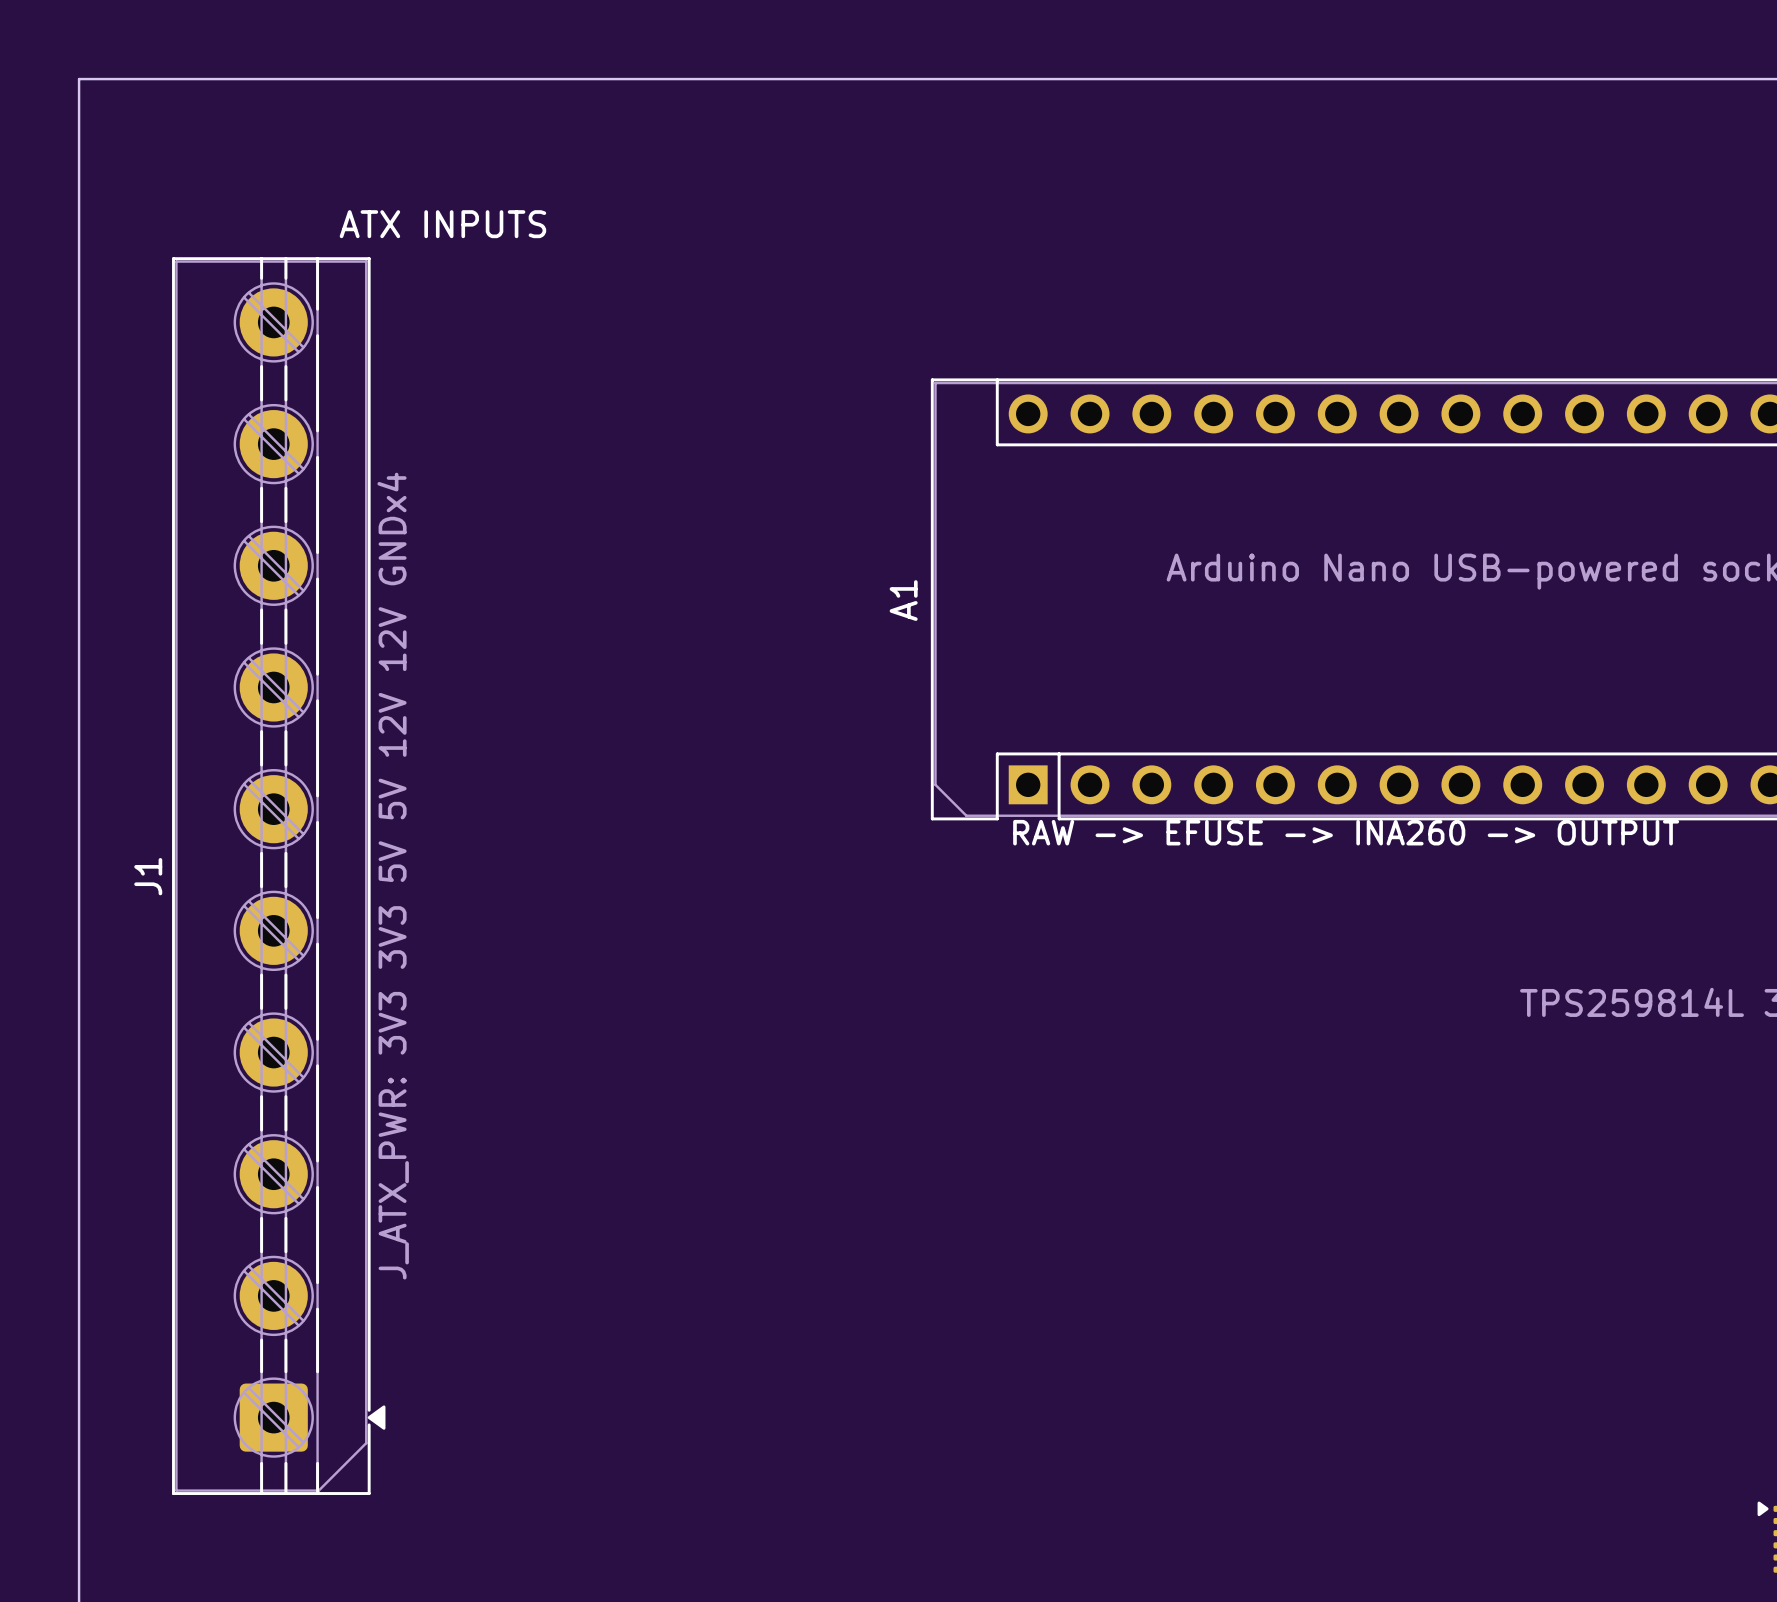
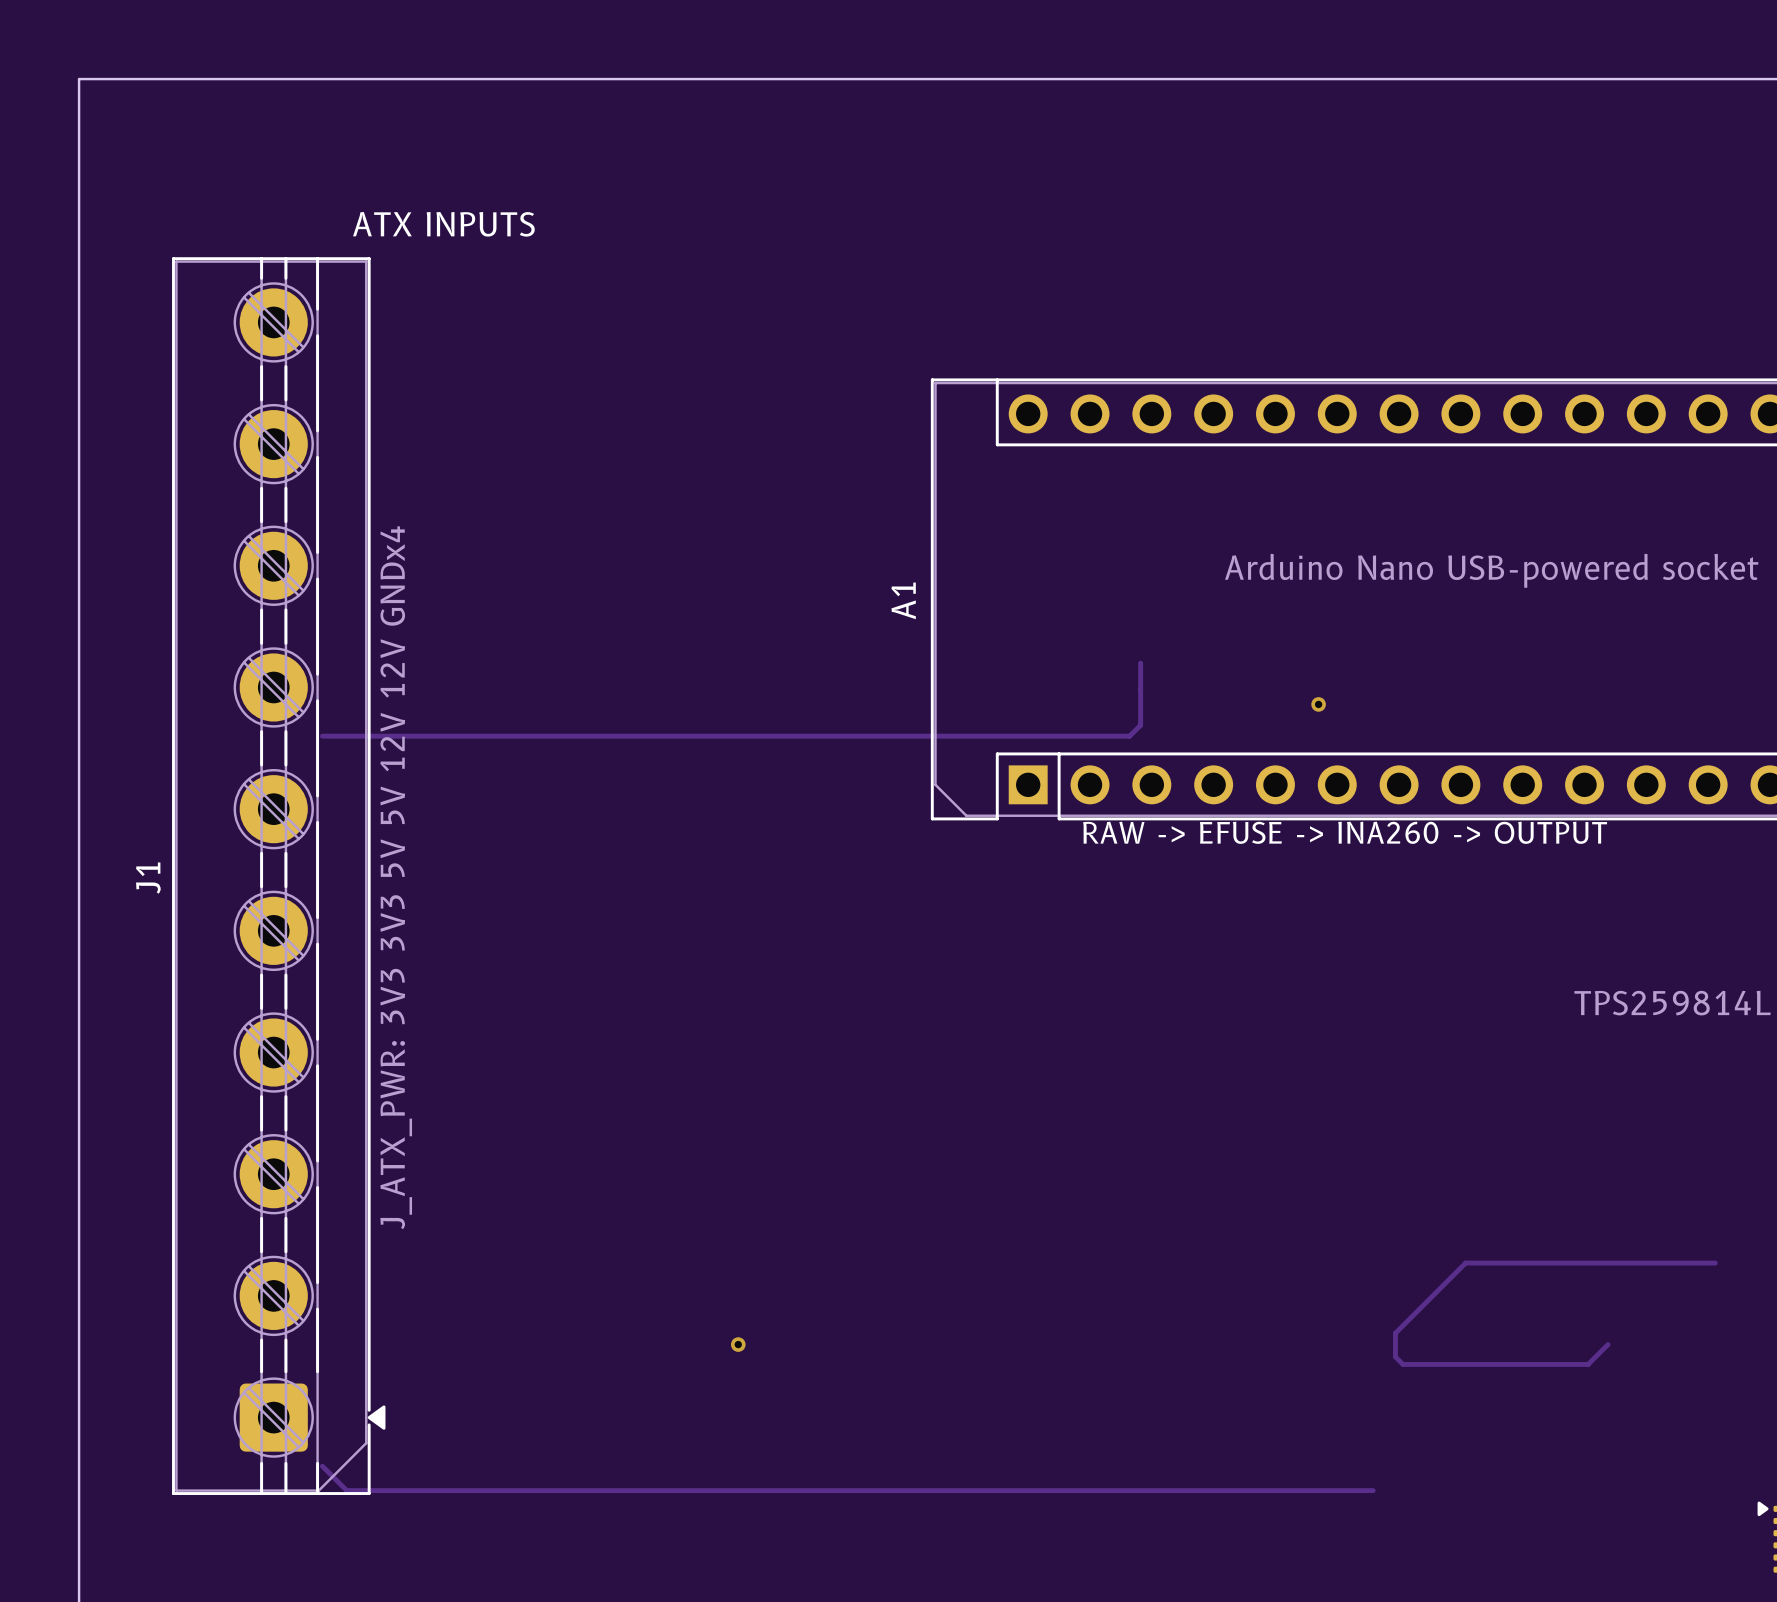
track: none -> (1140, 663) (1140, 725) (1129, 736) (322, 736)
via: none -> (1318, 704)
track: none -> (1715, 1263) (1465, 1263) (1395, 1333) (1395, 1356) (1402, 1364) (1588, 1364) (1608, 1344)
via: none -> (738, 1344)
track: none -> (322, 1466) (346, 1490) (1373, 1490)

